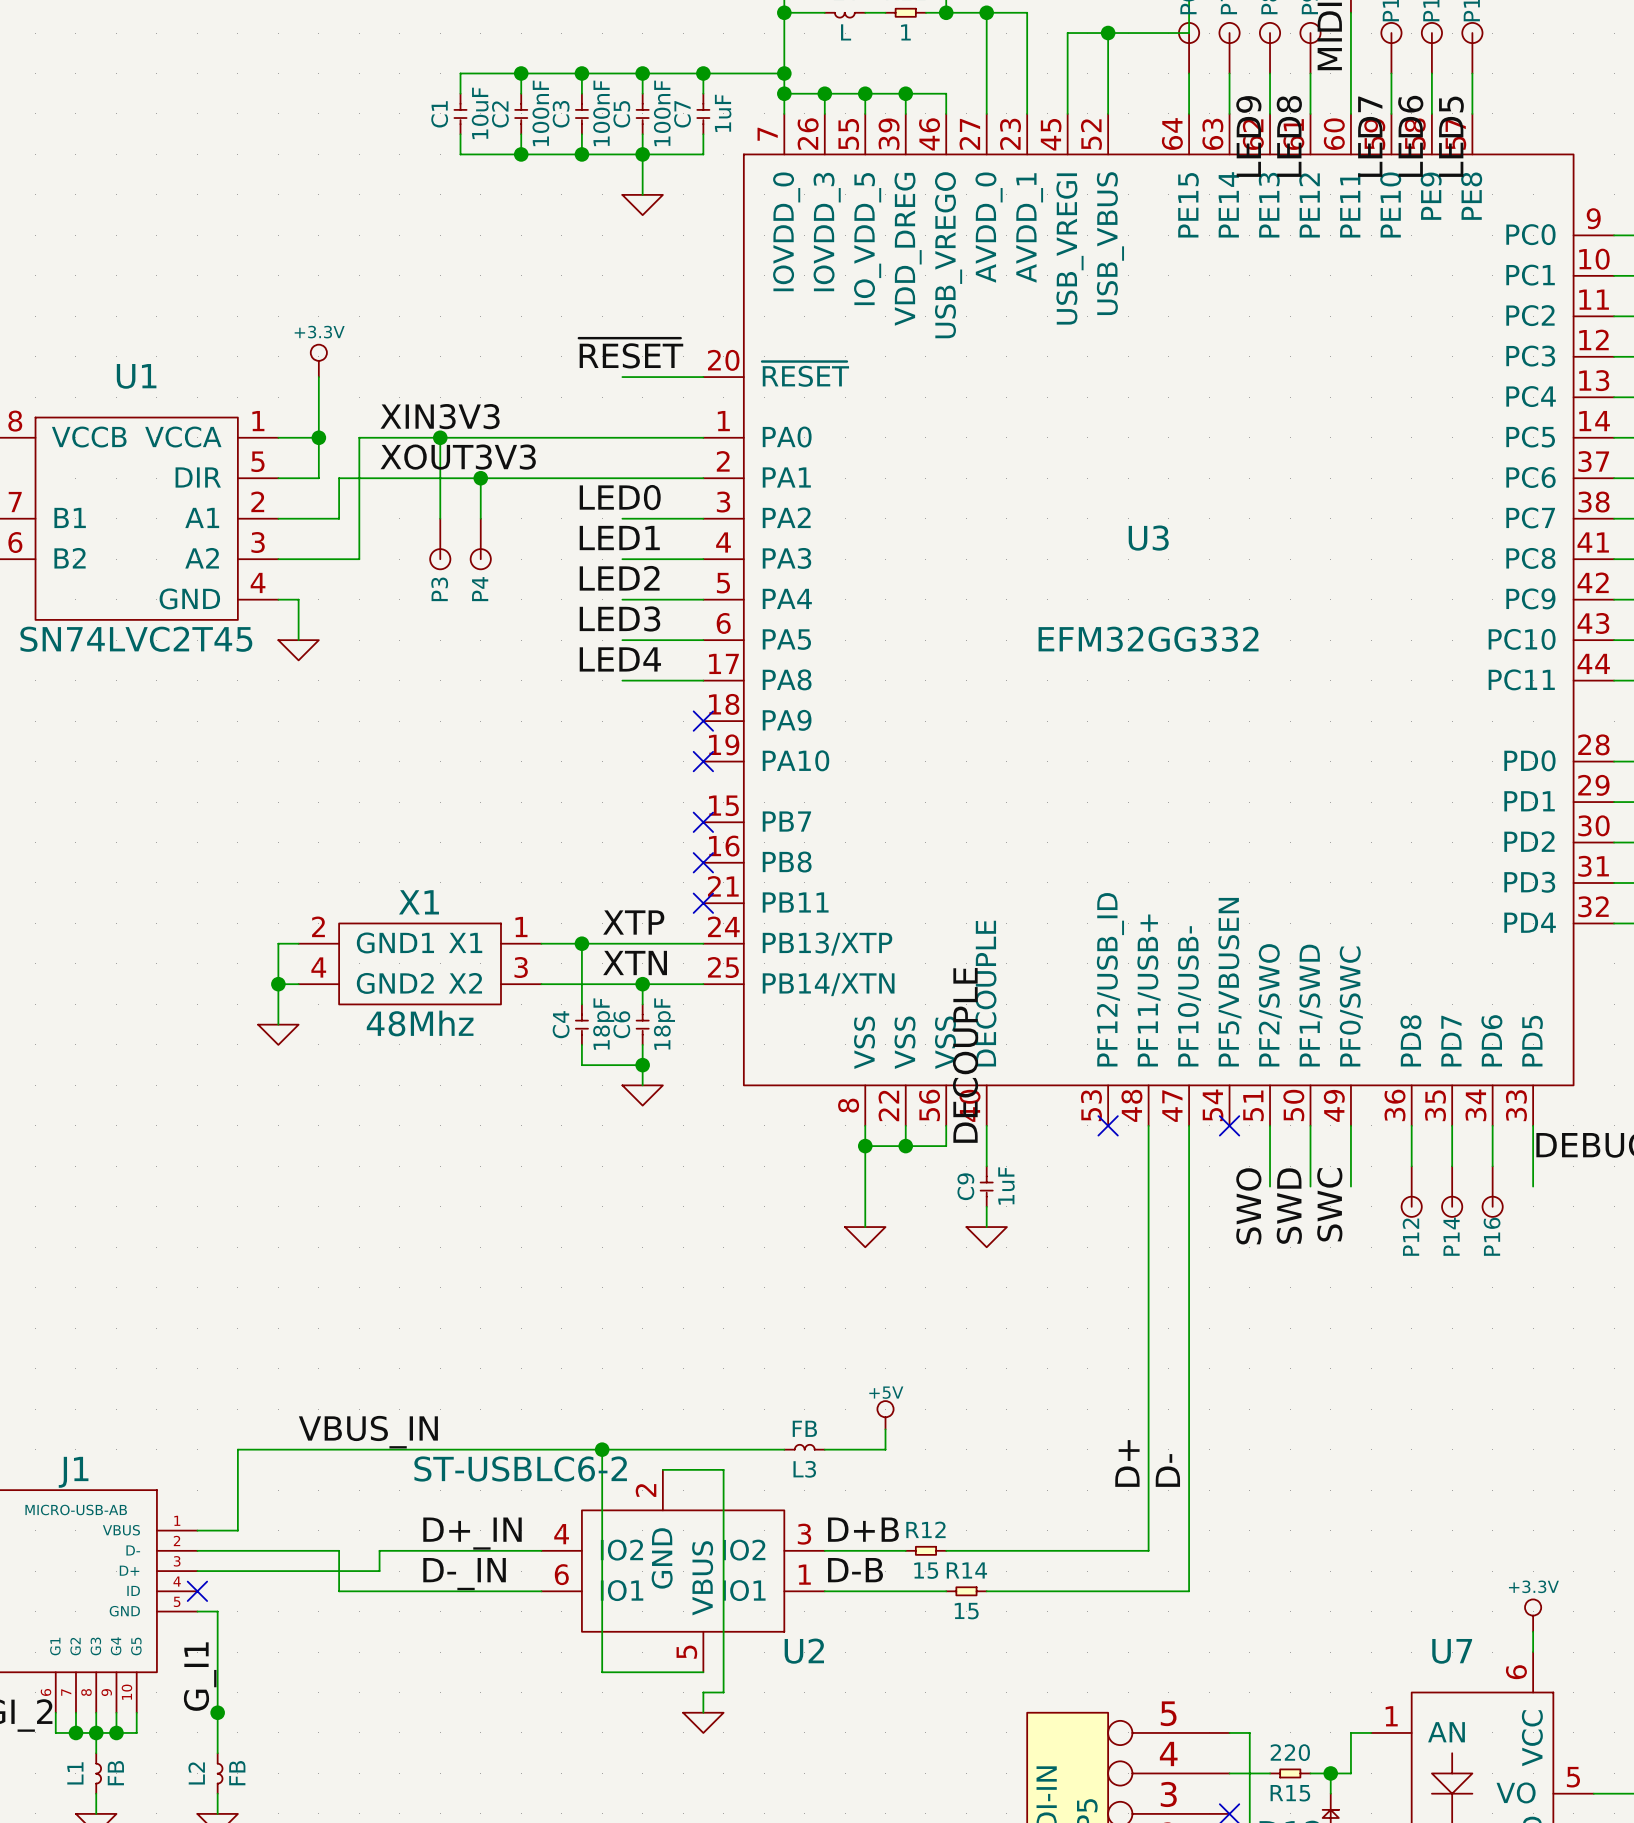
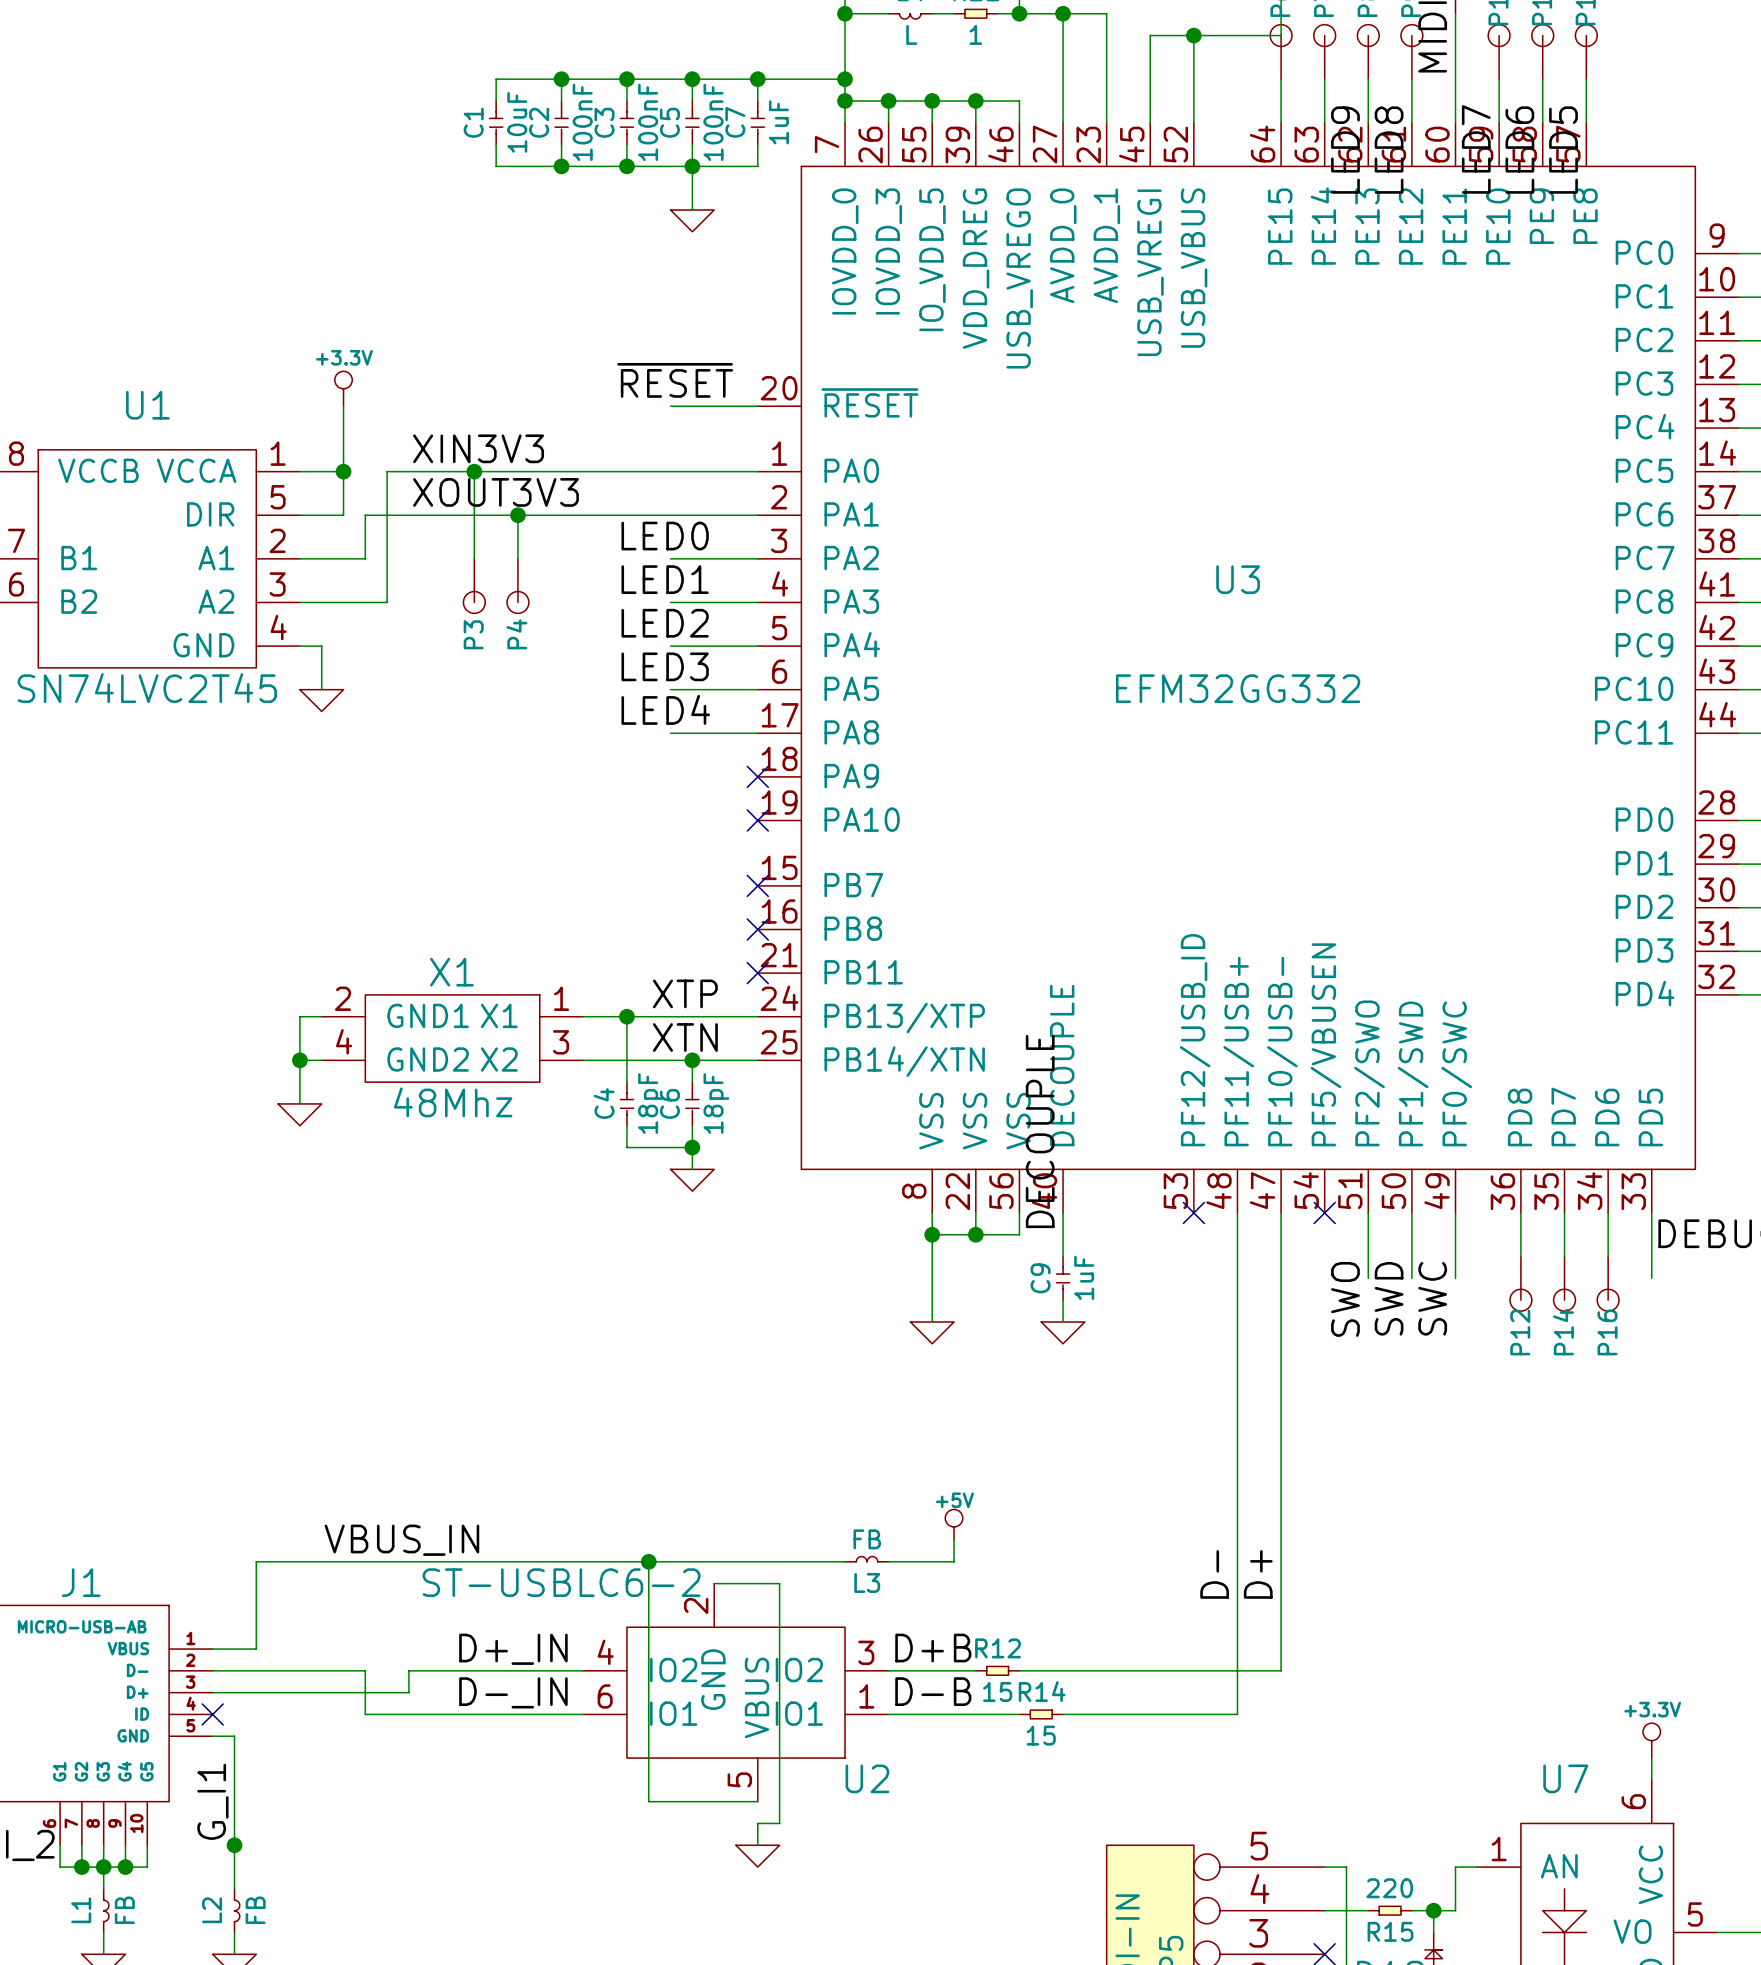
label: D+ (1127, 1463) -> D- (1214, 1574)
label: D- (1167, 1470) -> D+ (1258, 1574)
wire: (1189, 1550) (1189, 1591) (1148, 1591) -> (1281, 1670) (1237, 1670) (1237, 1714)

